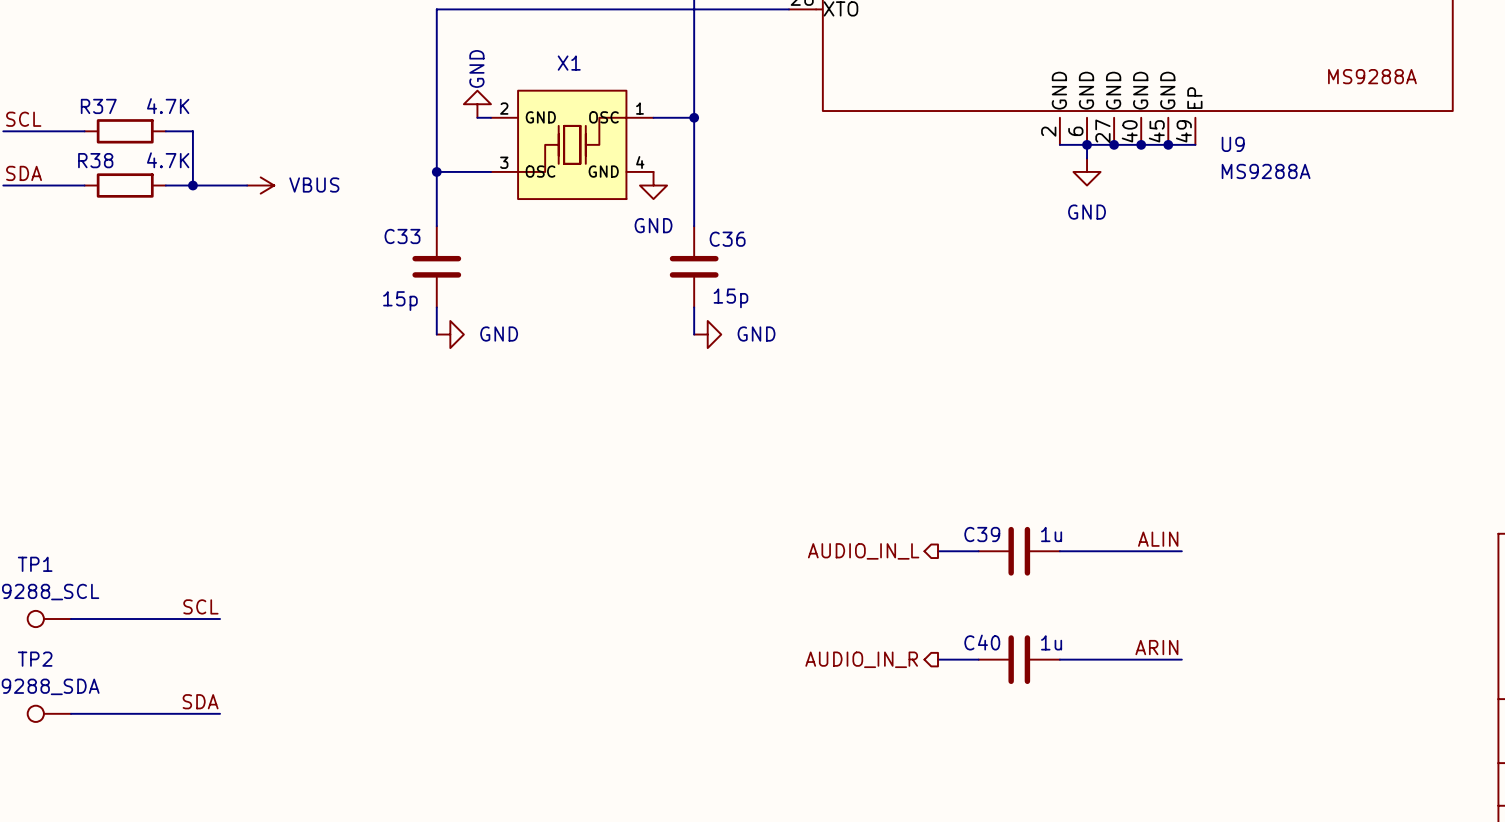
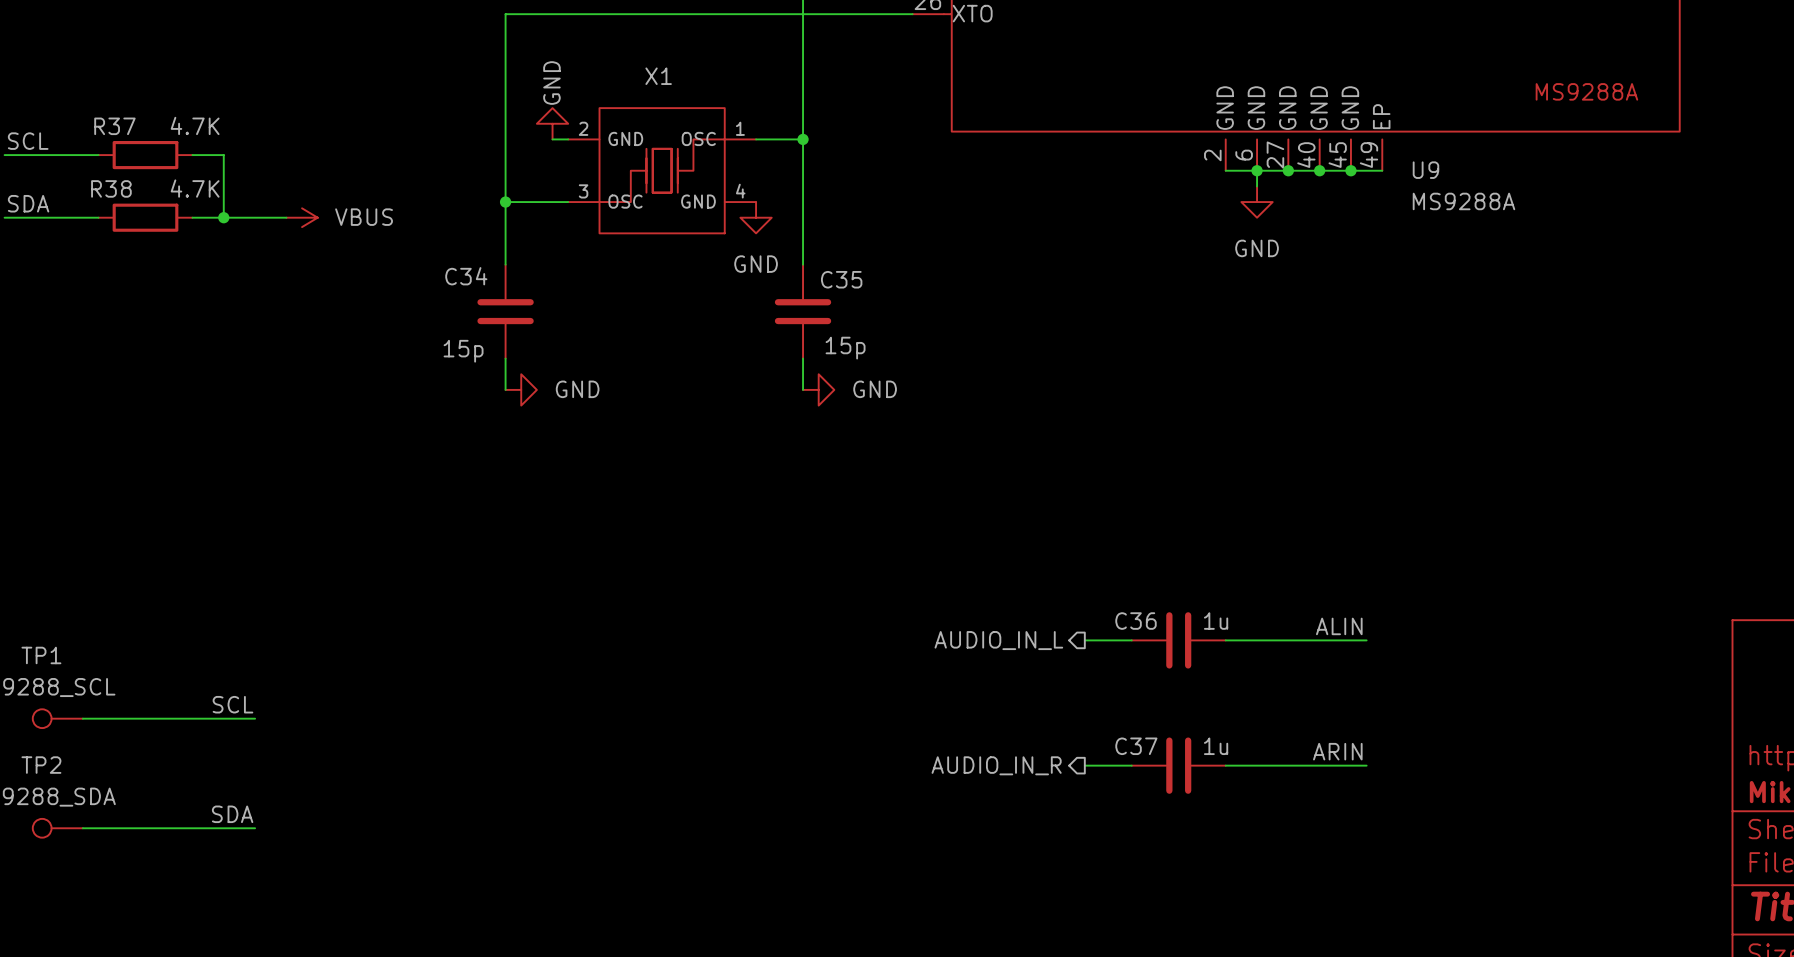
C33 name: C33 (402, 236) -> C34 (466, 276)
C36 name: C36 (727, 239) -> C35 (841, 279)
C39 name: C39 (982, 534) -> C36 (1136, 621)
C40 name: C40 (982, 642) -> C37 (1136, 746)

